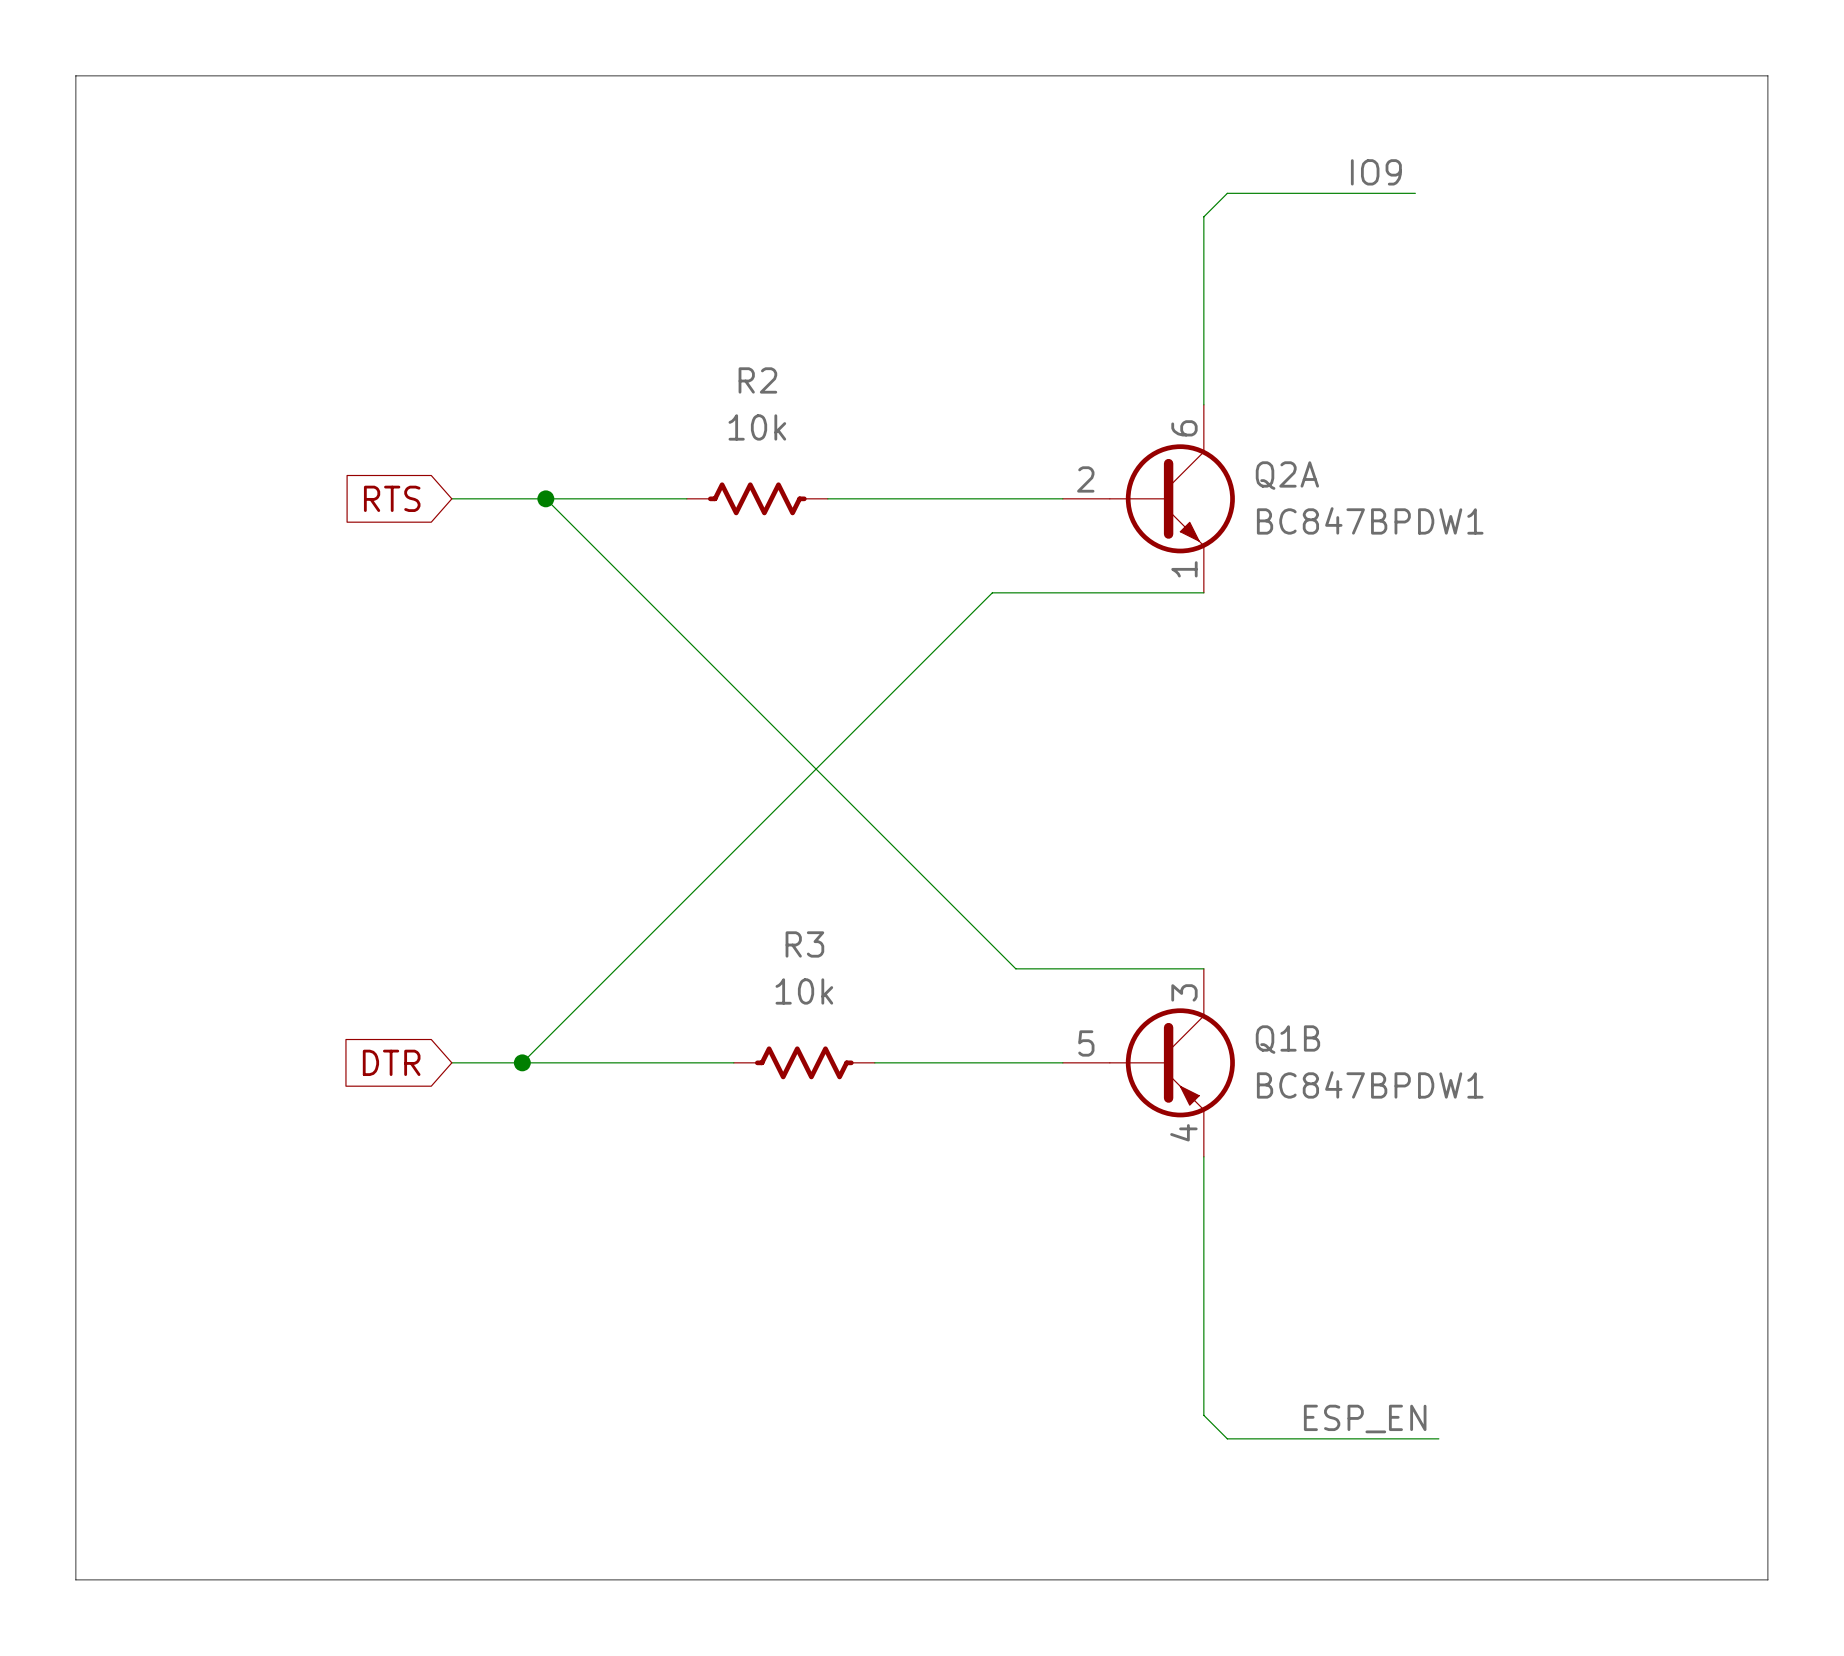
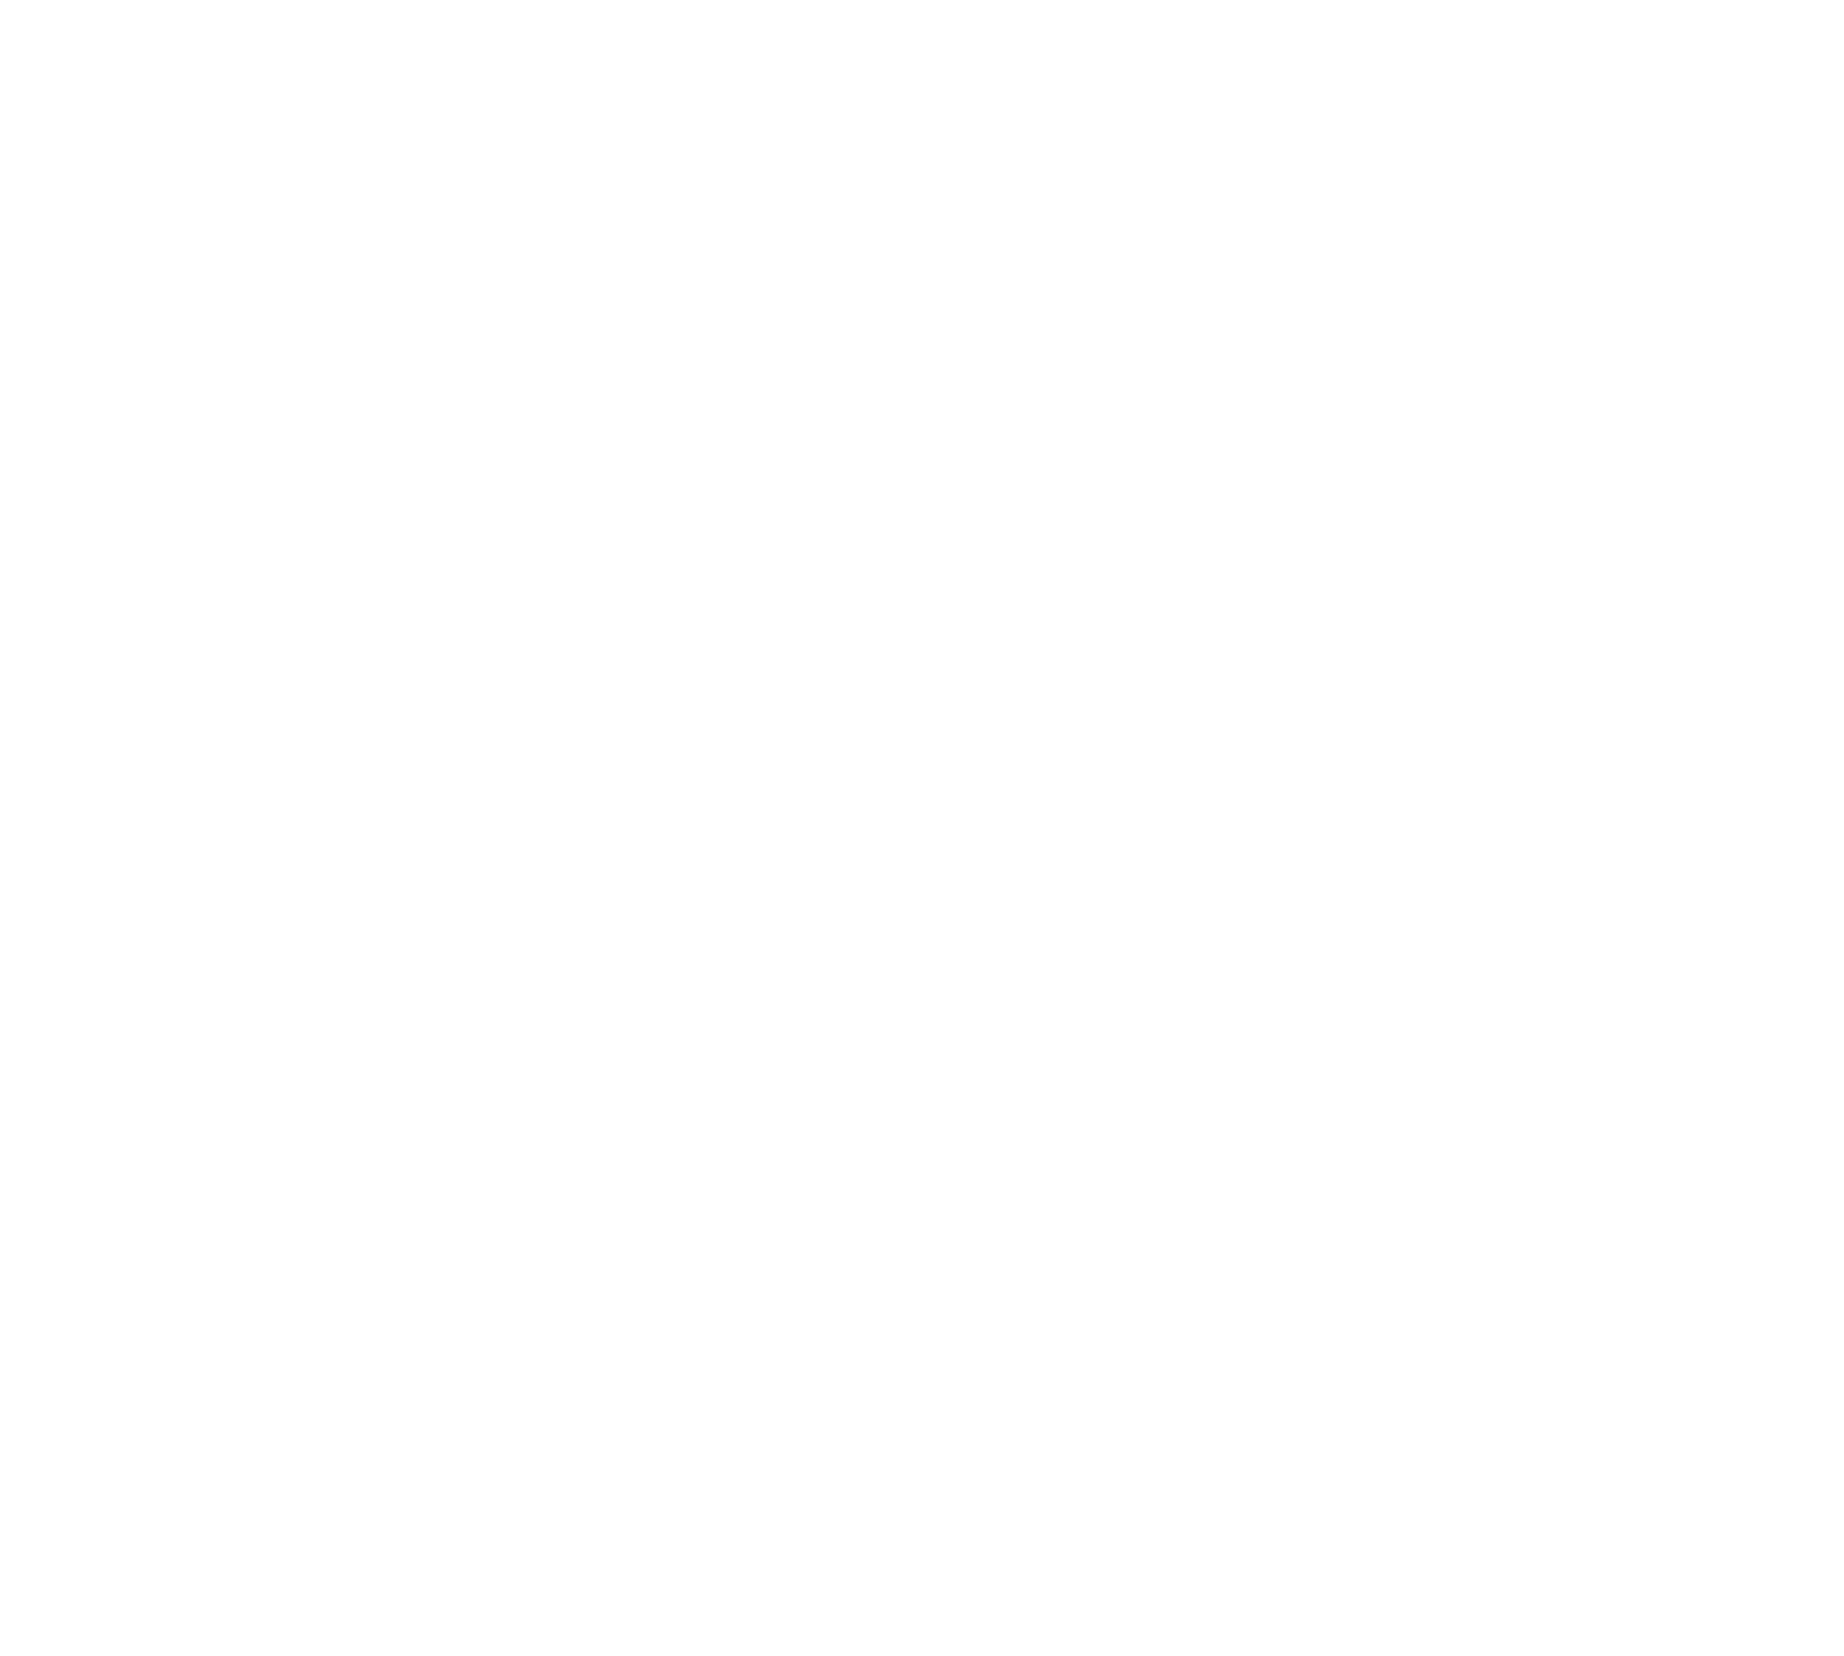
line: (75, 75) (1767, 75) (1767, 1579) (75, 1579) (75, 75) -> none
label: IO9 (1376, 172) -> none
wire: (1415, 193) (1227, 193) (1203, 216) (1203, 404) -> none
global label: RTS (392, 498) -> none
wire: (451, 498) (686, 498) -> none
wire: (545, 498) (1015, 968) (1203, 968) -> none
junction: (545, 498) -> none
R2: 10k (757, 498) -> none
wire: (827, 498) (1062, 498) -> none
Q2A: BC847BPDW1 (1148, 498) -> none
wire: (1203, 592) (992, 592) (522, 1062) -> none
global label: DTR (391, 1062) -> none
wire: (451, 1062) (733, 1062) -> none
junction: (522, 1062) -> none
R3: 10k (804, 1062) -> none
wire: (874, 1062) (1062, 1062) -> none
Q1B: BC847BPDW1 (1148, 1062) -> none
wire: (1203, 1156) (1203, 1415) (1227, 1438) (1438, 1438) -> none
label: ESP_EN (1365, 1419) -> none

